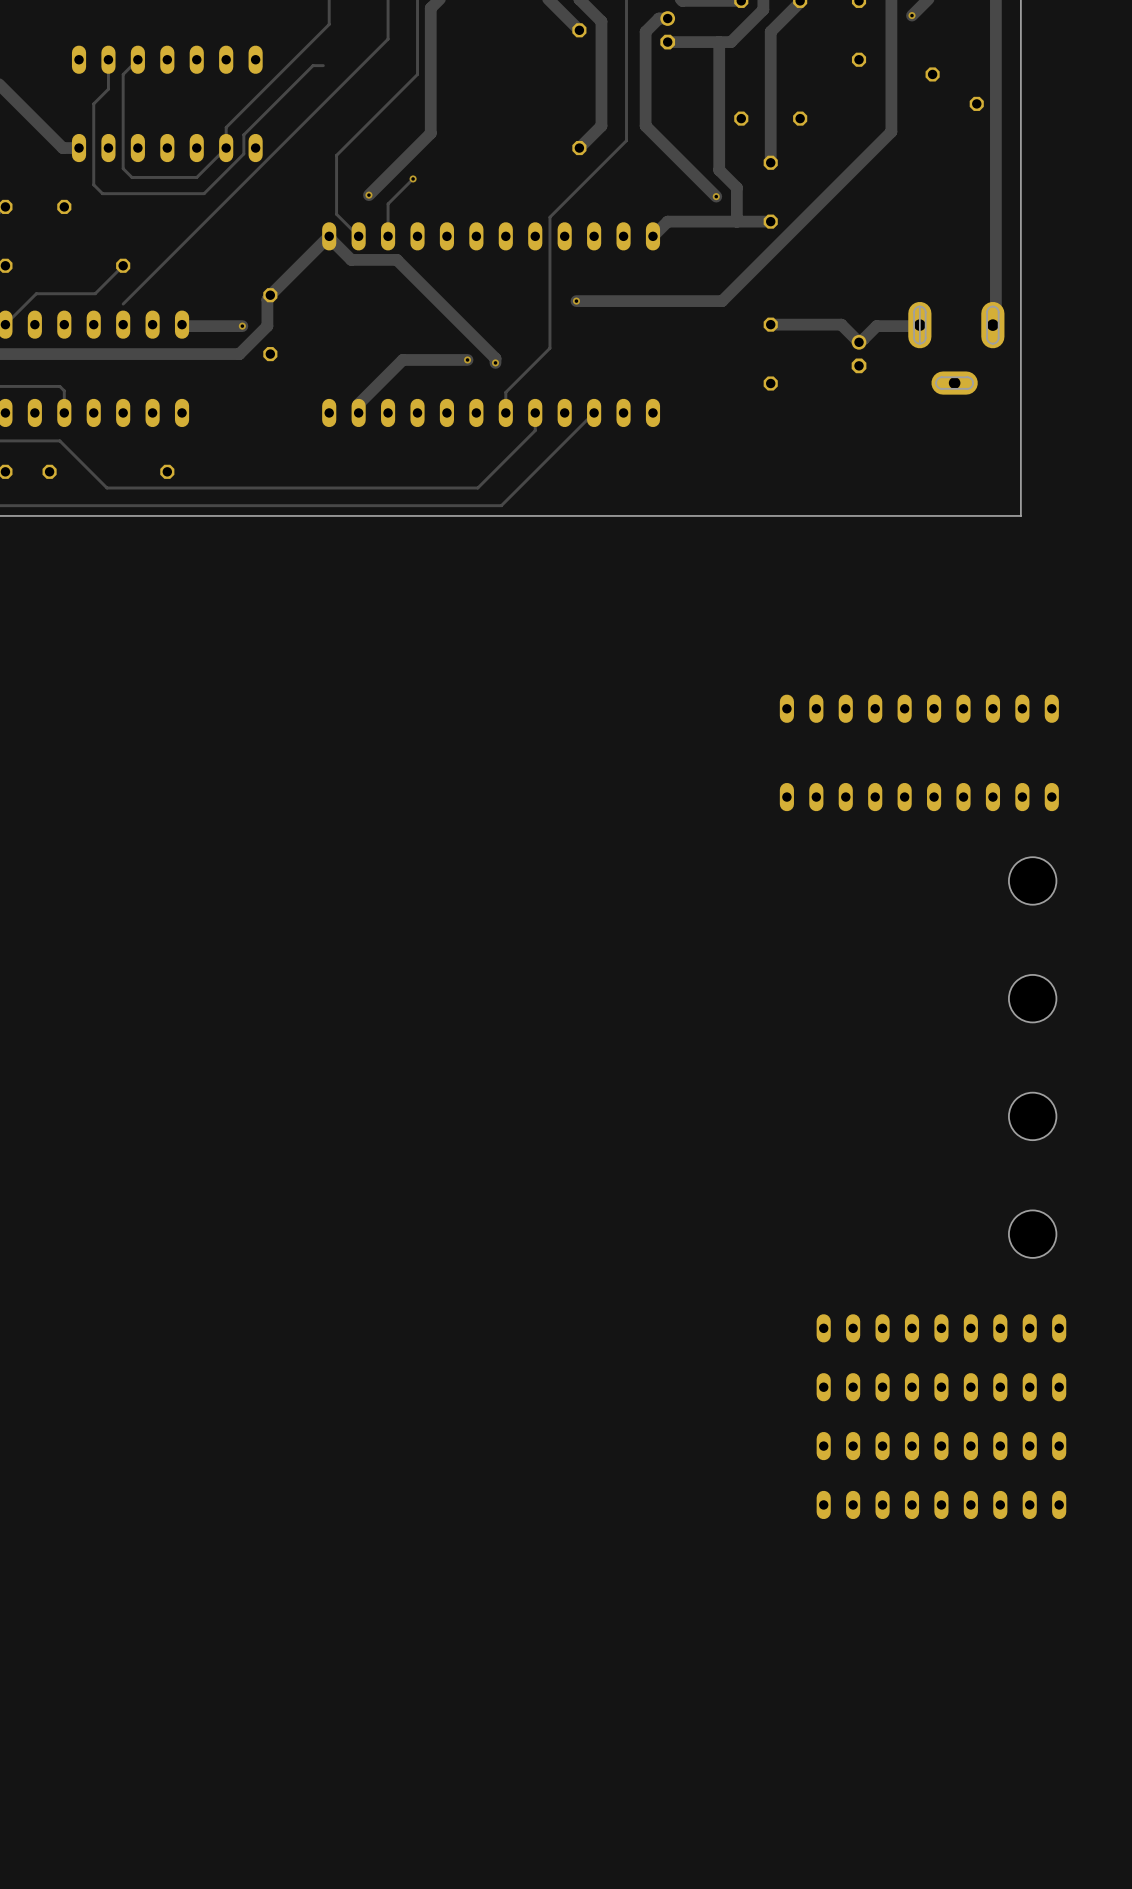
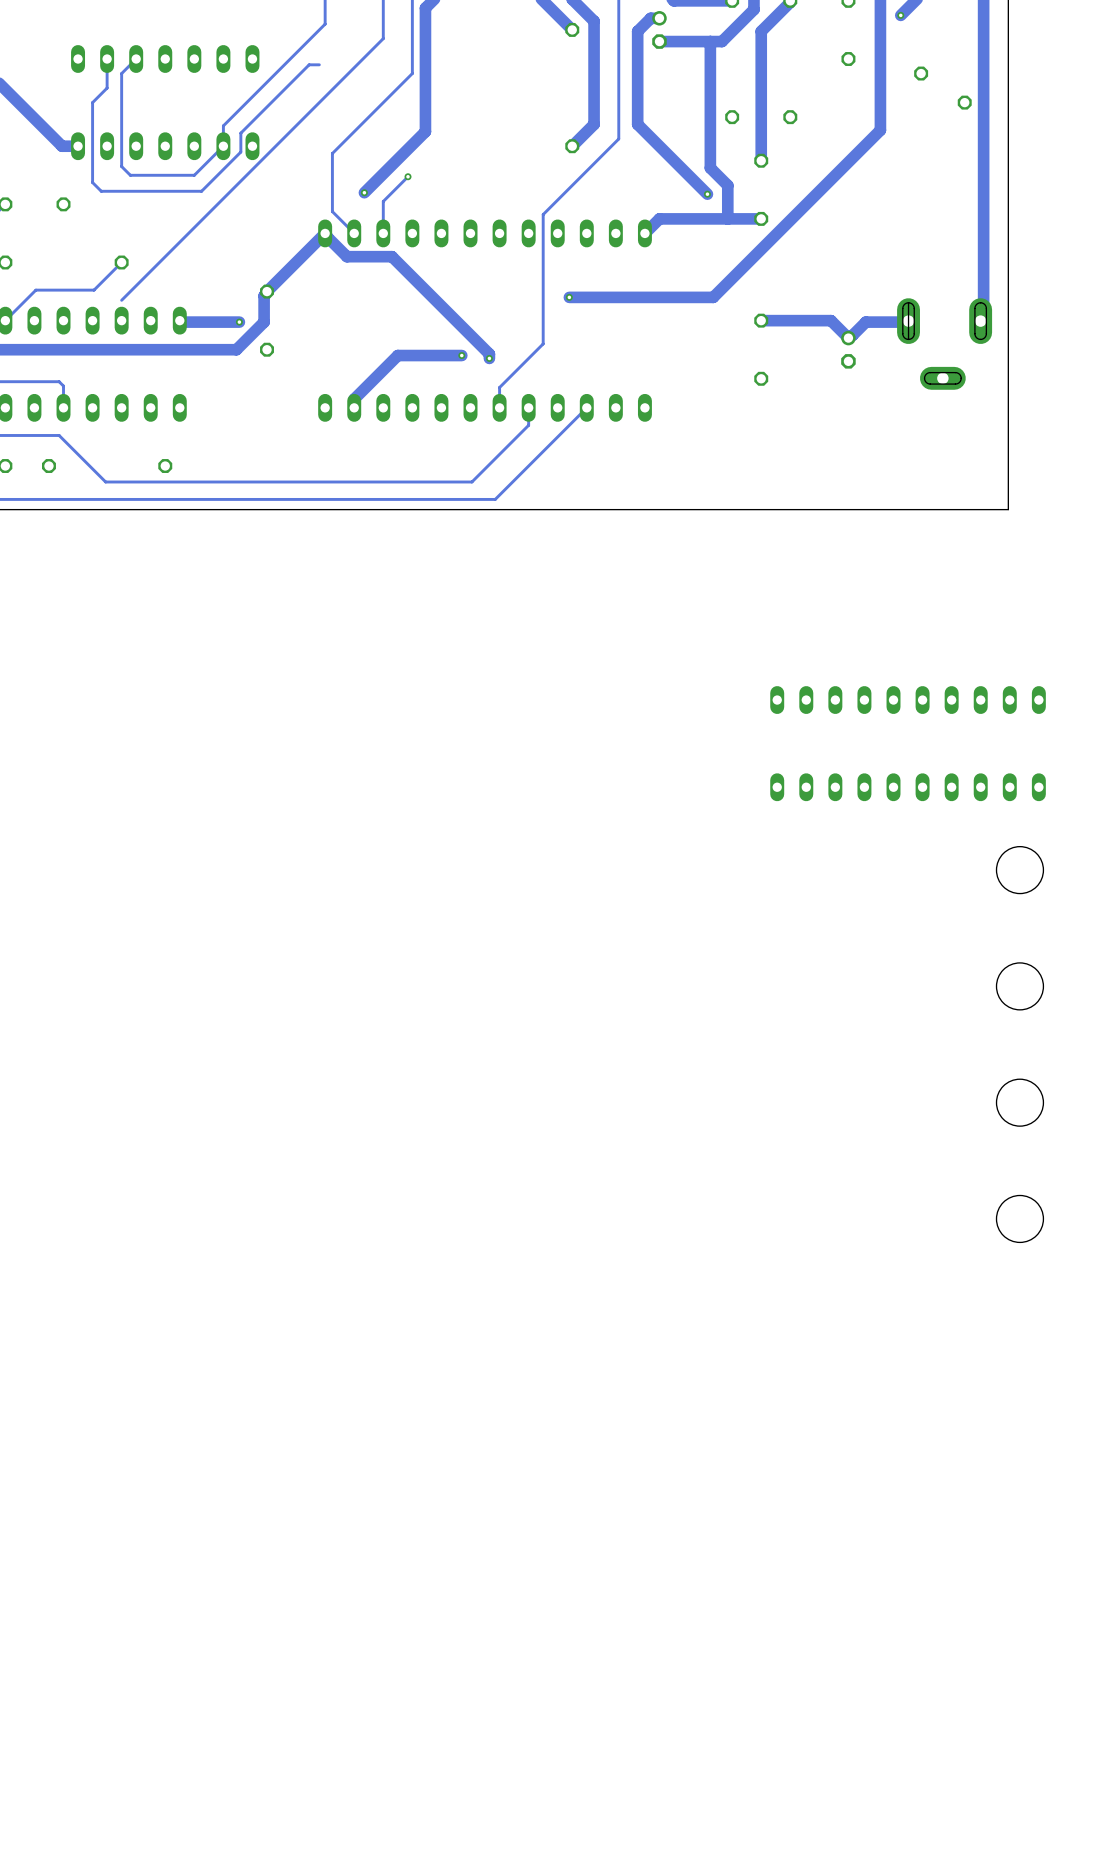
part: (941, 1328) -> none
part: (941, 1387) -> none
part: (941, 1446) -> none
part: (941, 1504) -> none

